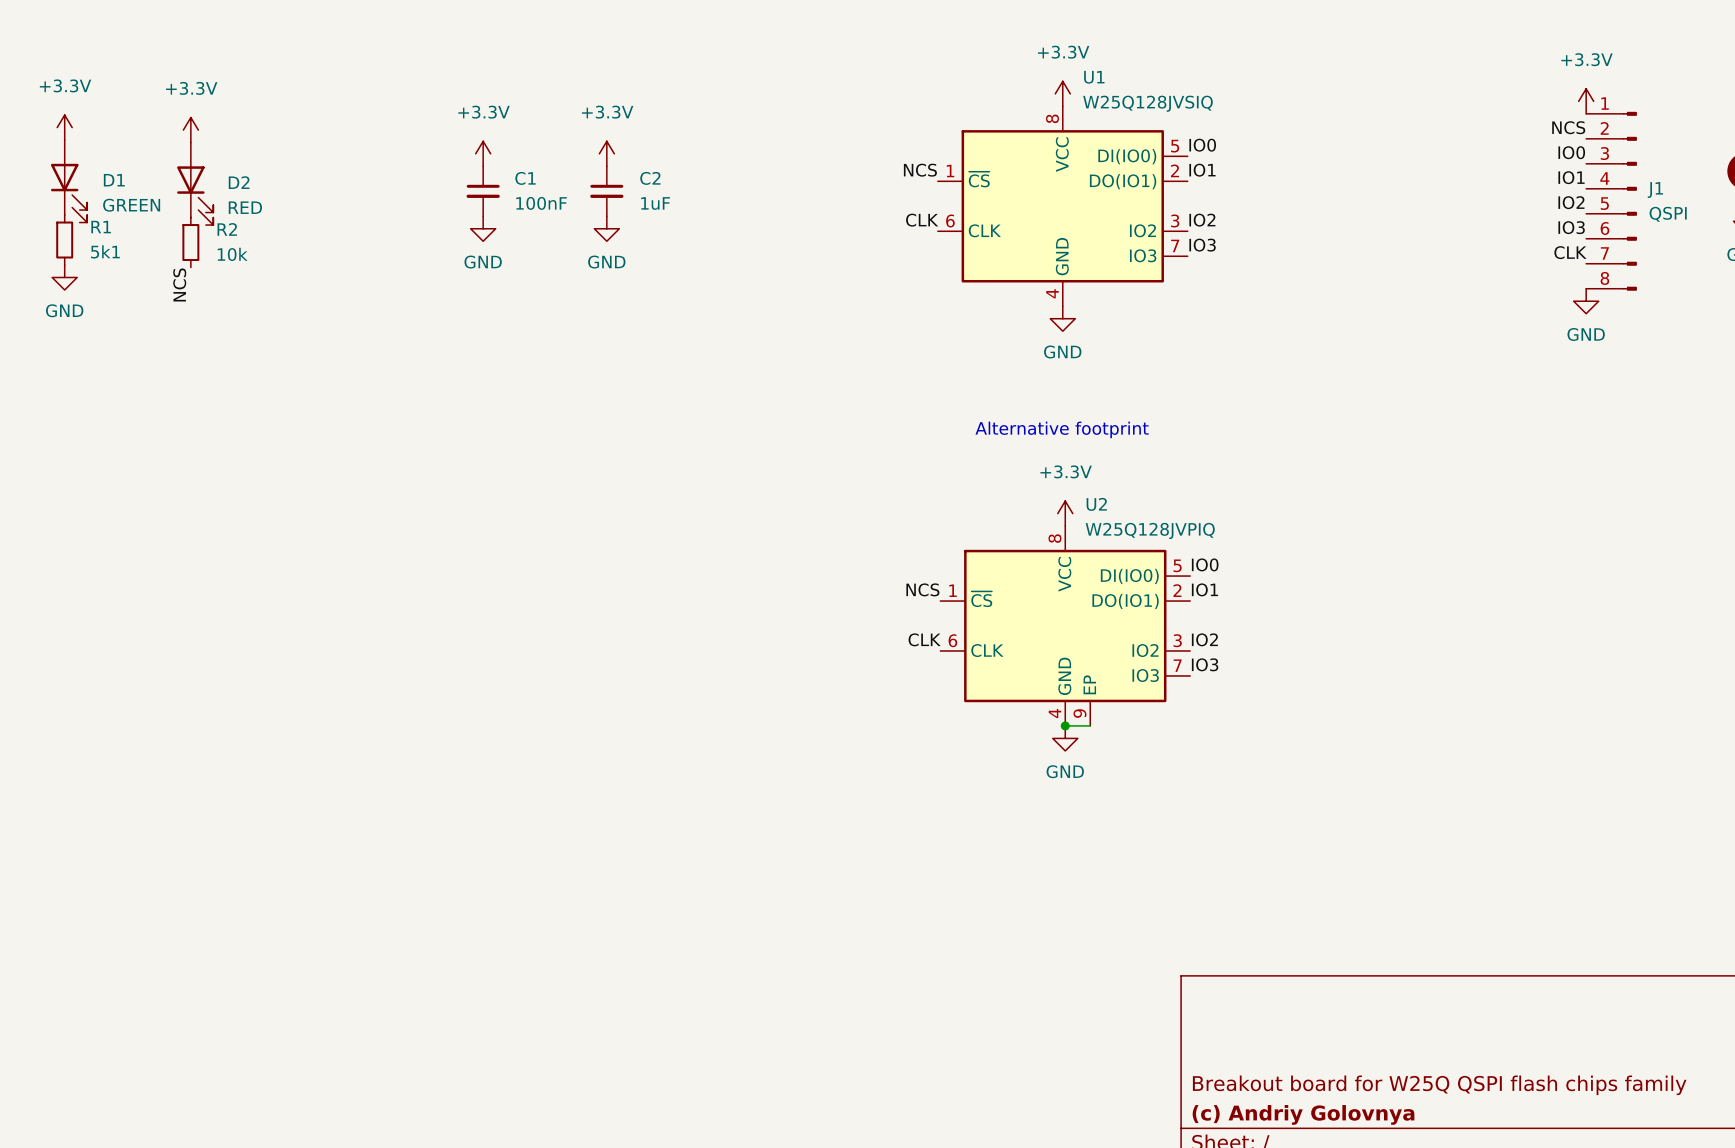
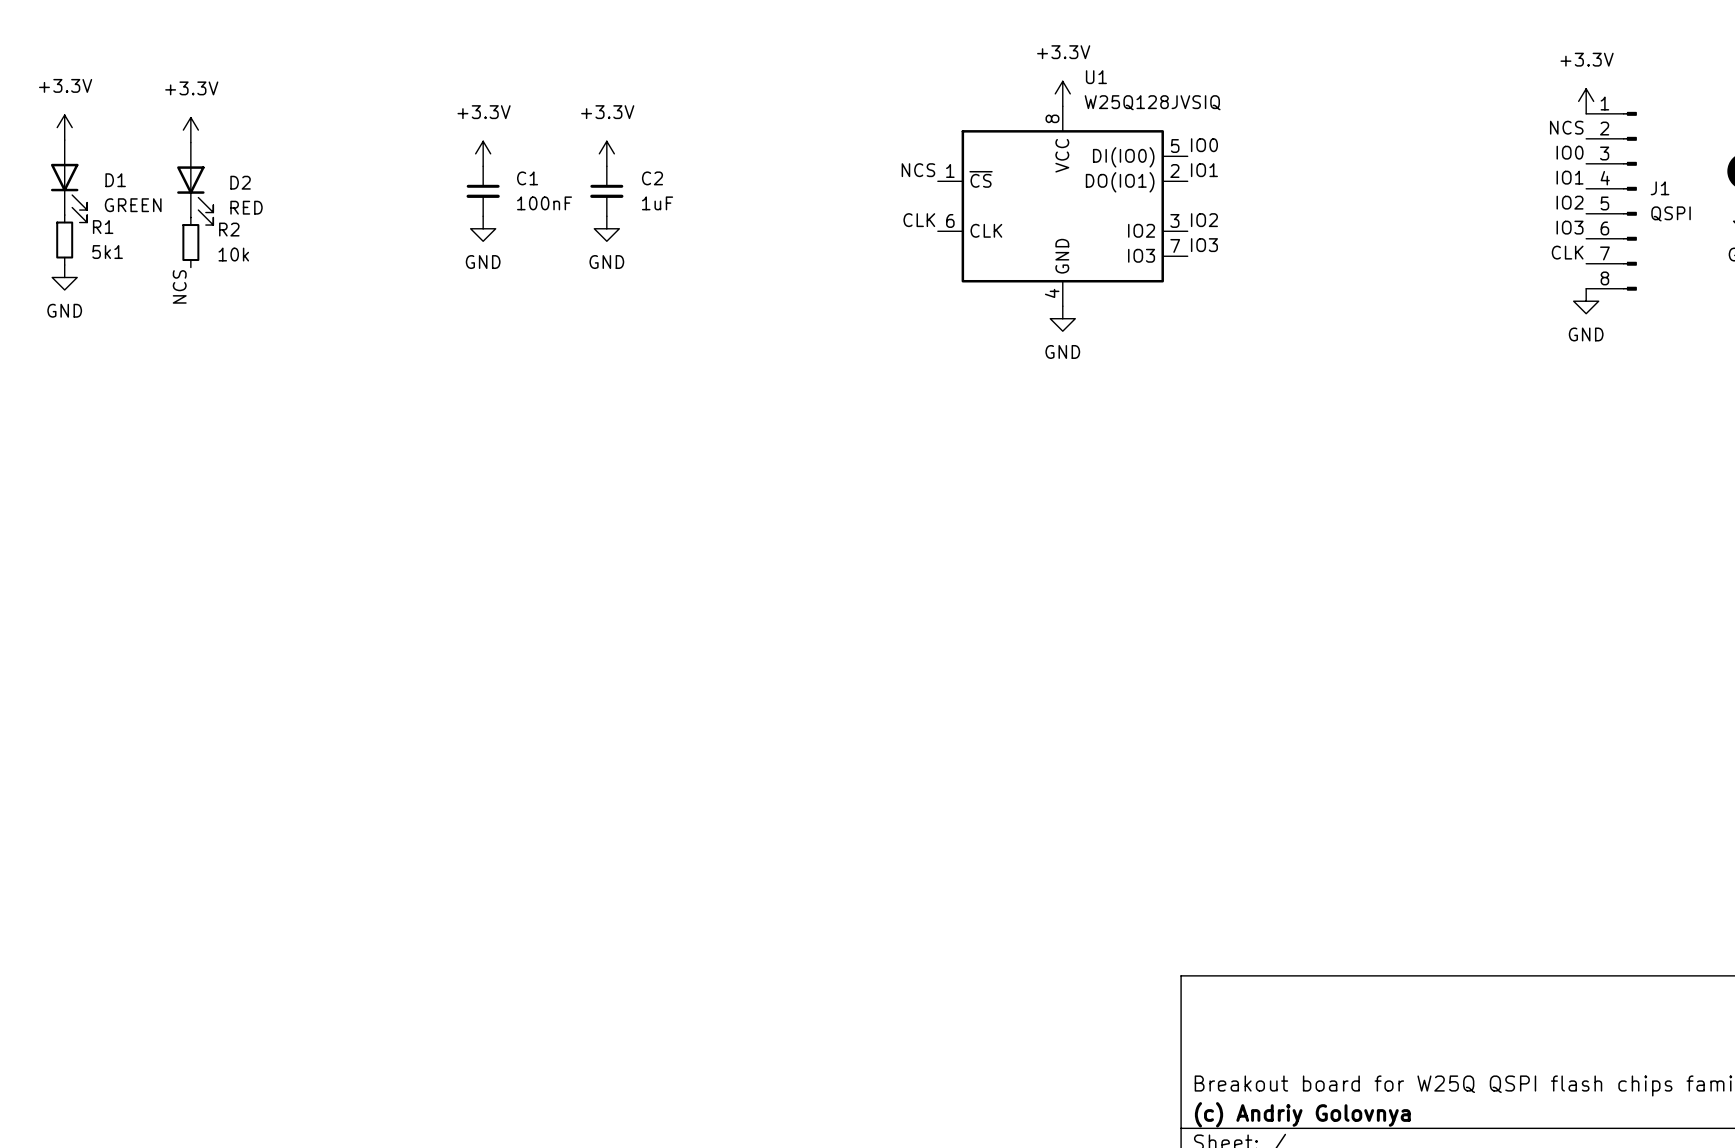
text: Alternative footprint (1062, 429) -> none
power symbol: +3.3V (1065, 513) -> none
label: IO0 (1205, 564) -> none
label: NCS (922, 589) -> none
label: IO1 (1204, 589) -> none
U2: W25Q128JVPIQ (1065, 626) -> none
label: CLK (924, 639) -> none
label: IO2 (1204, 639) -> none
label: IO3 (1205, 664) -> none
wire: (1065, 725) (1090, 725) -> none
junction: (1065, 725) -> none
power symbol: GND (1065, 738) -> none

